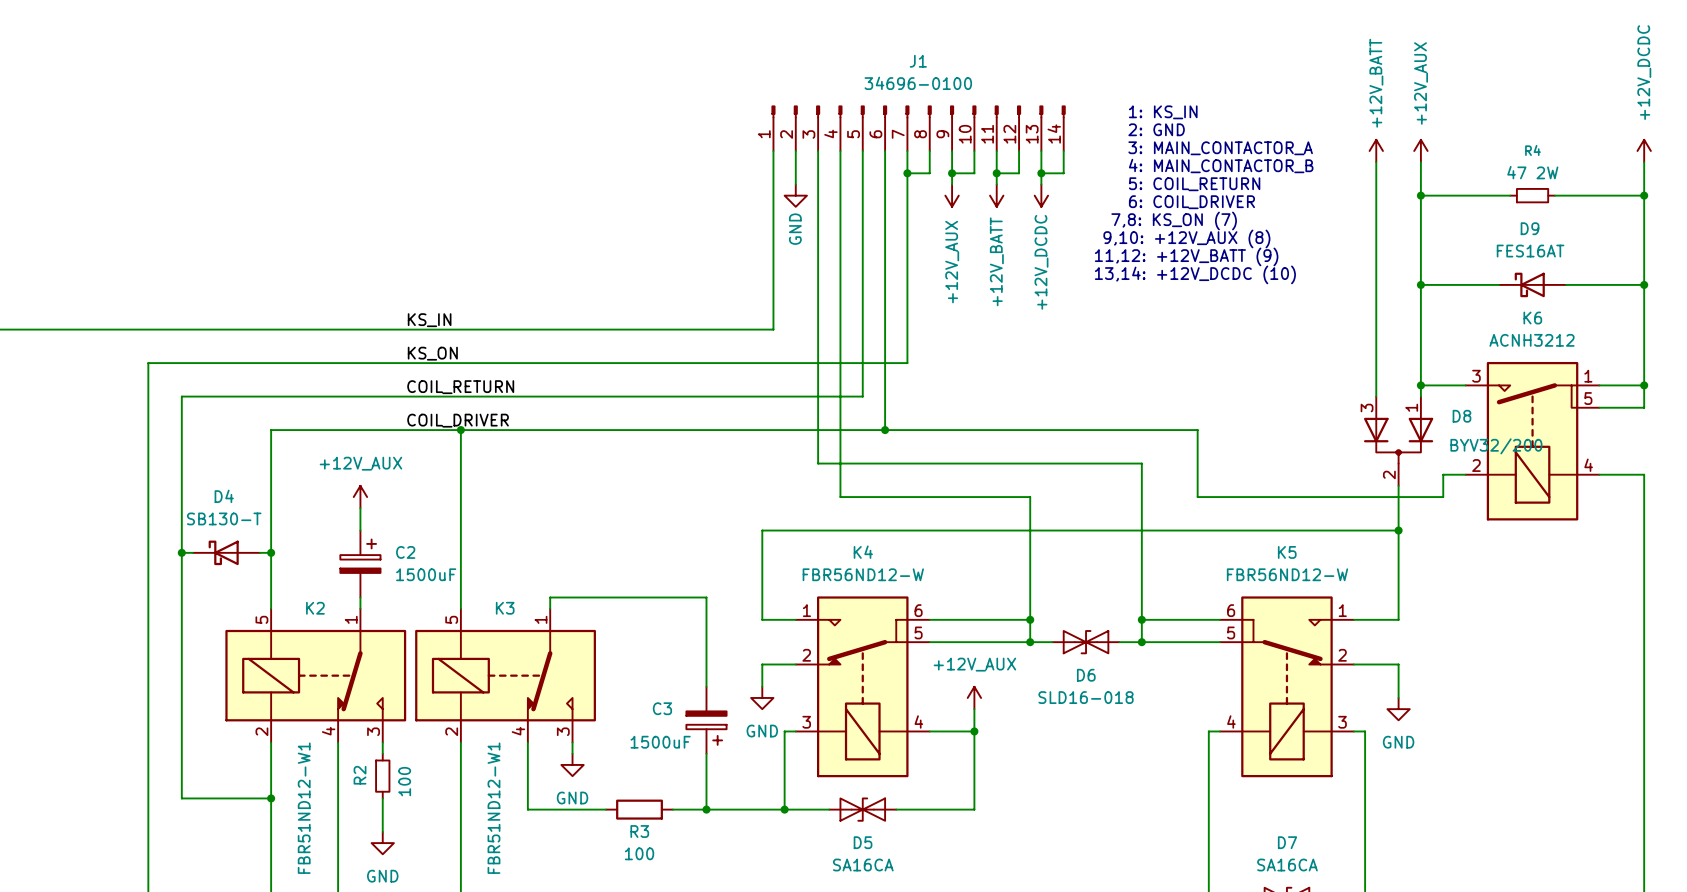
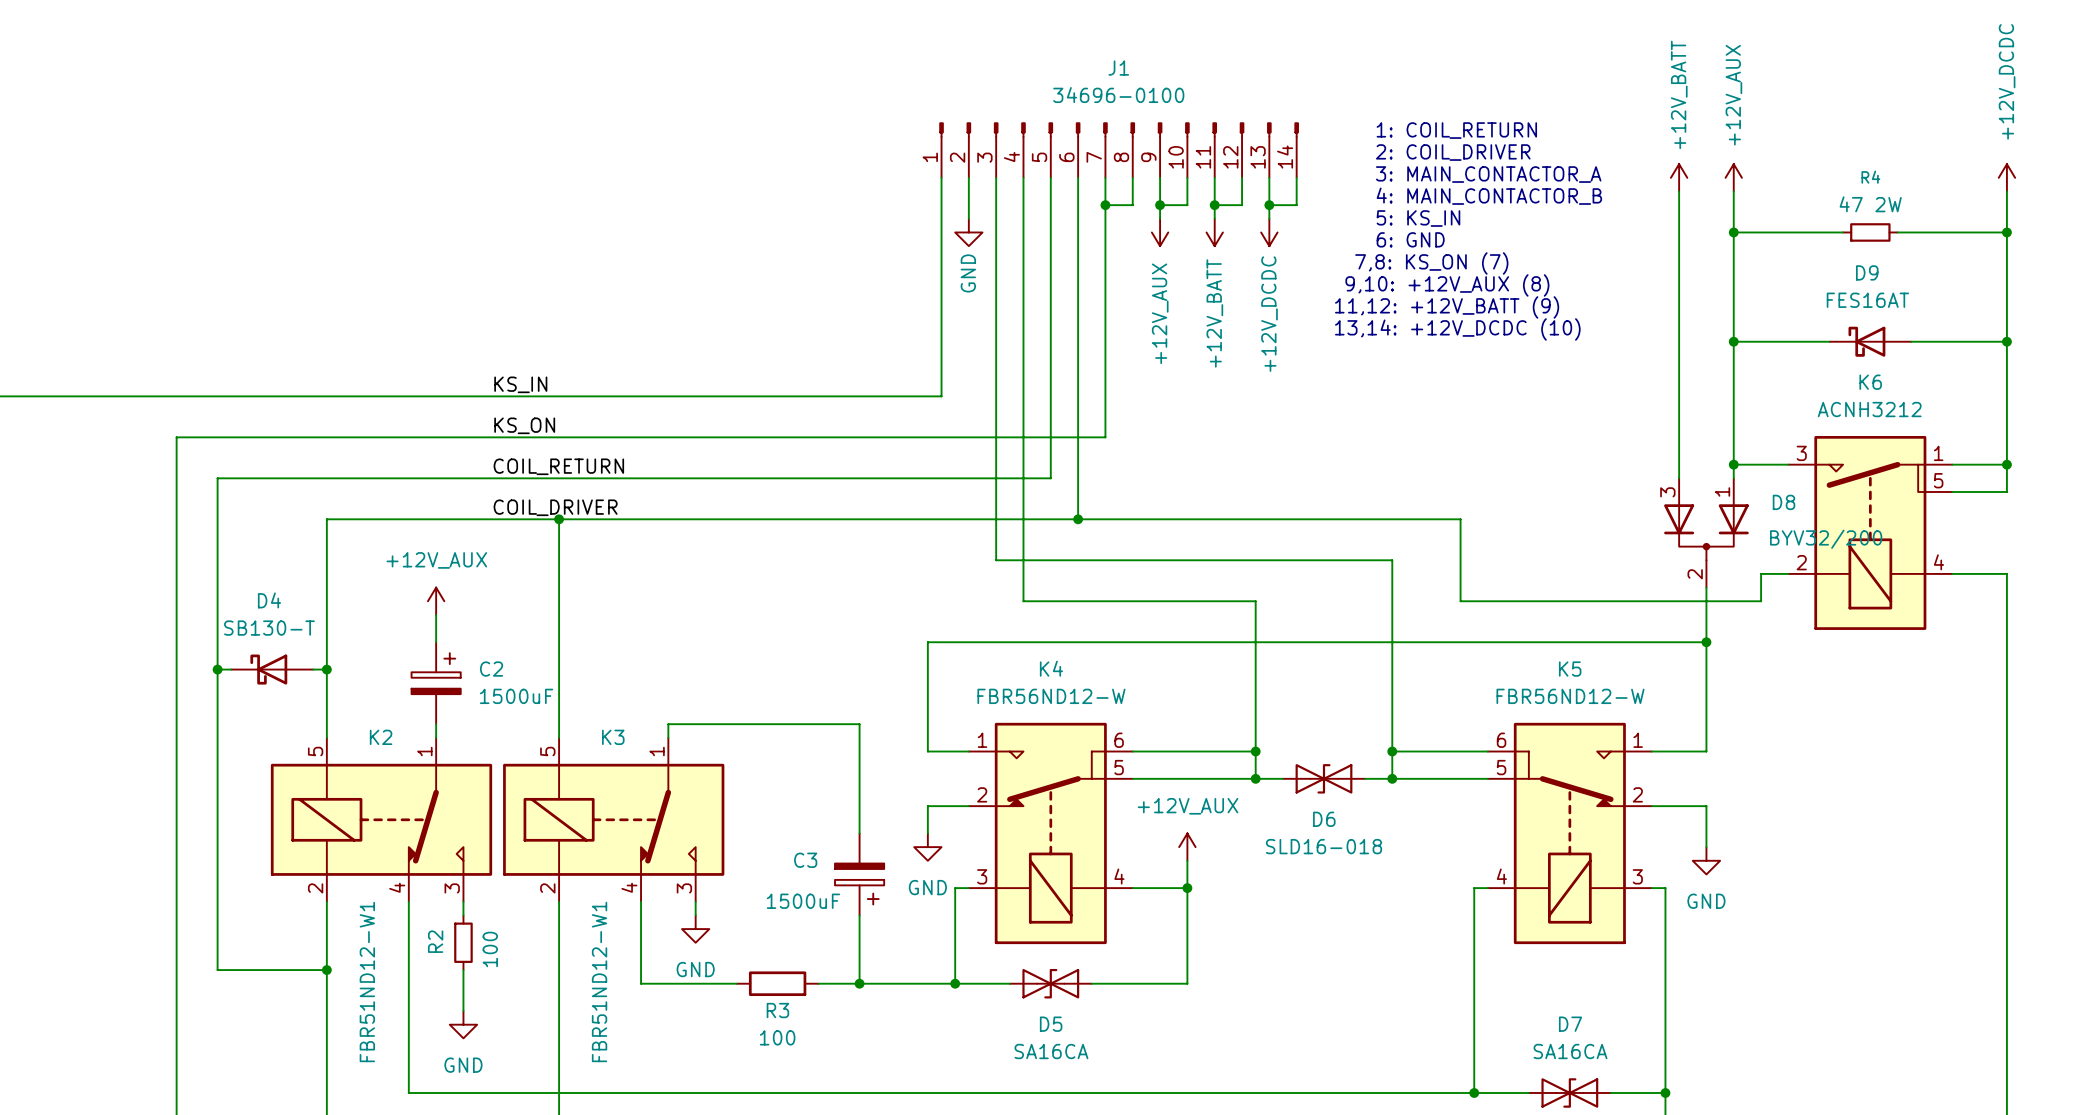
text: 1: KS_IN (1163, 112) -> 1: COIL_RETURN (1456, 130)
text: 2: GND (1156, 129) -> 2: COIL_DRIVER (1453, 152)
text: 5: COIL_RETURN (1194, 184) -> 5: KS_IN (1418, 218)
text: 6: COIL_DRIVER (1191, 202) -> 6: GND (1410, 239)

